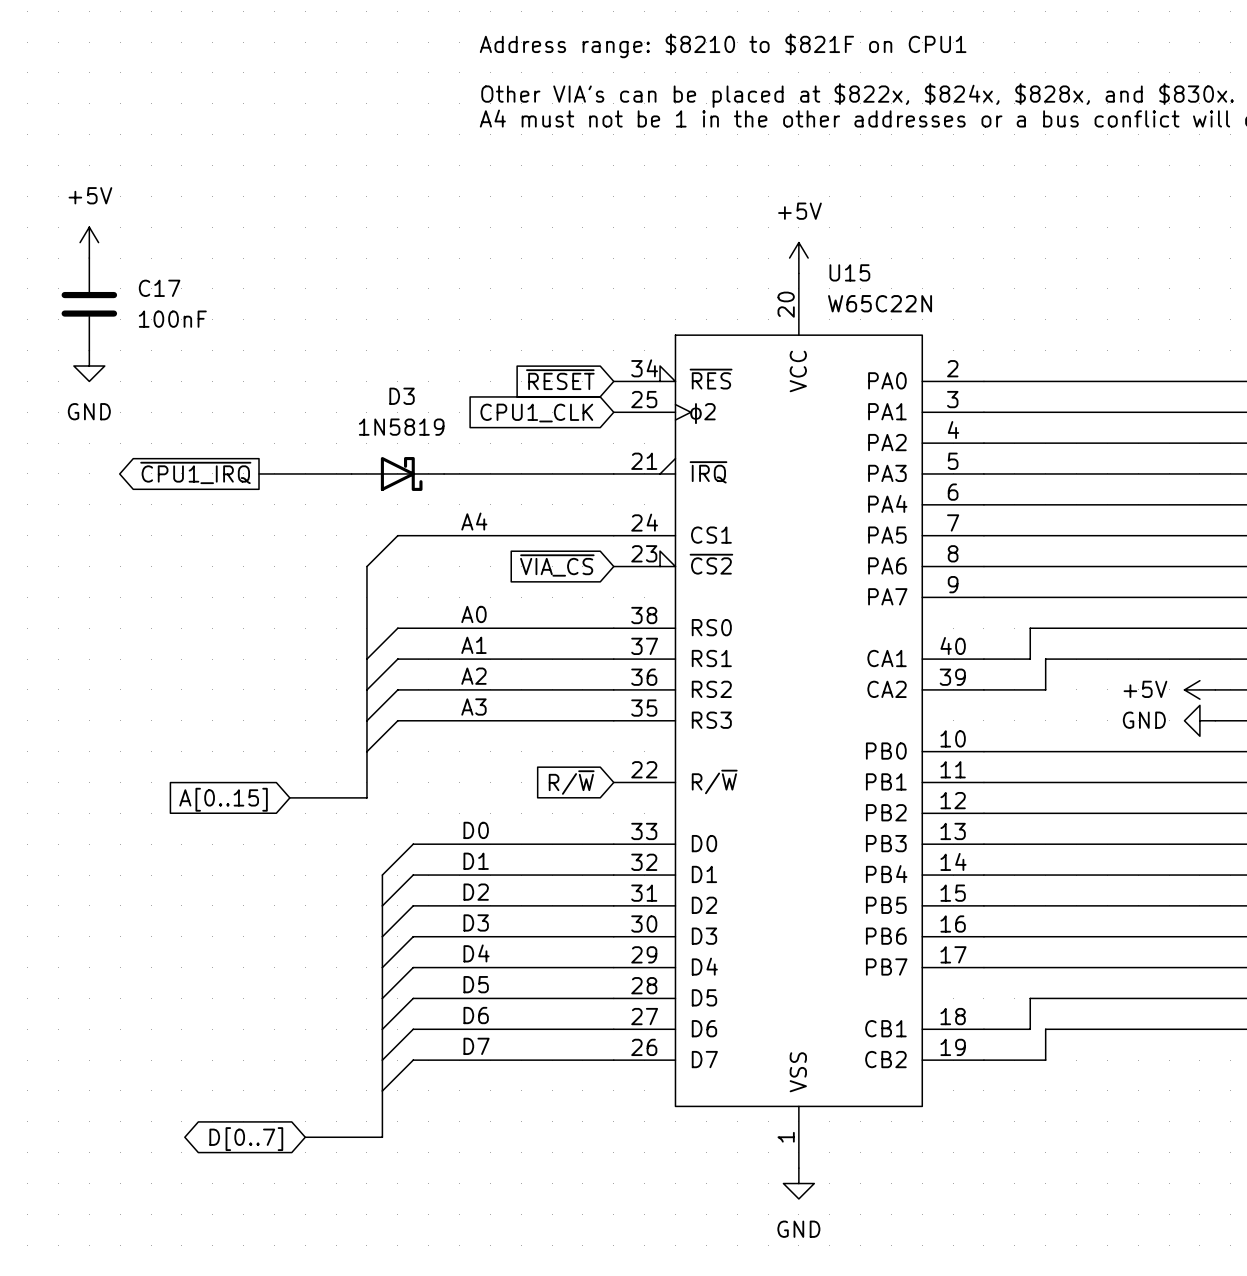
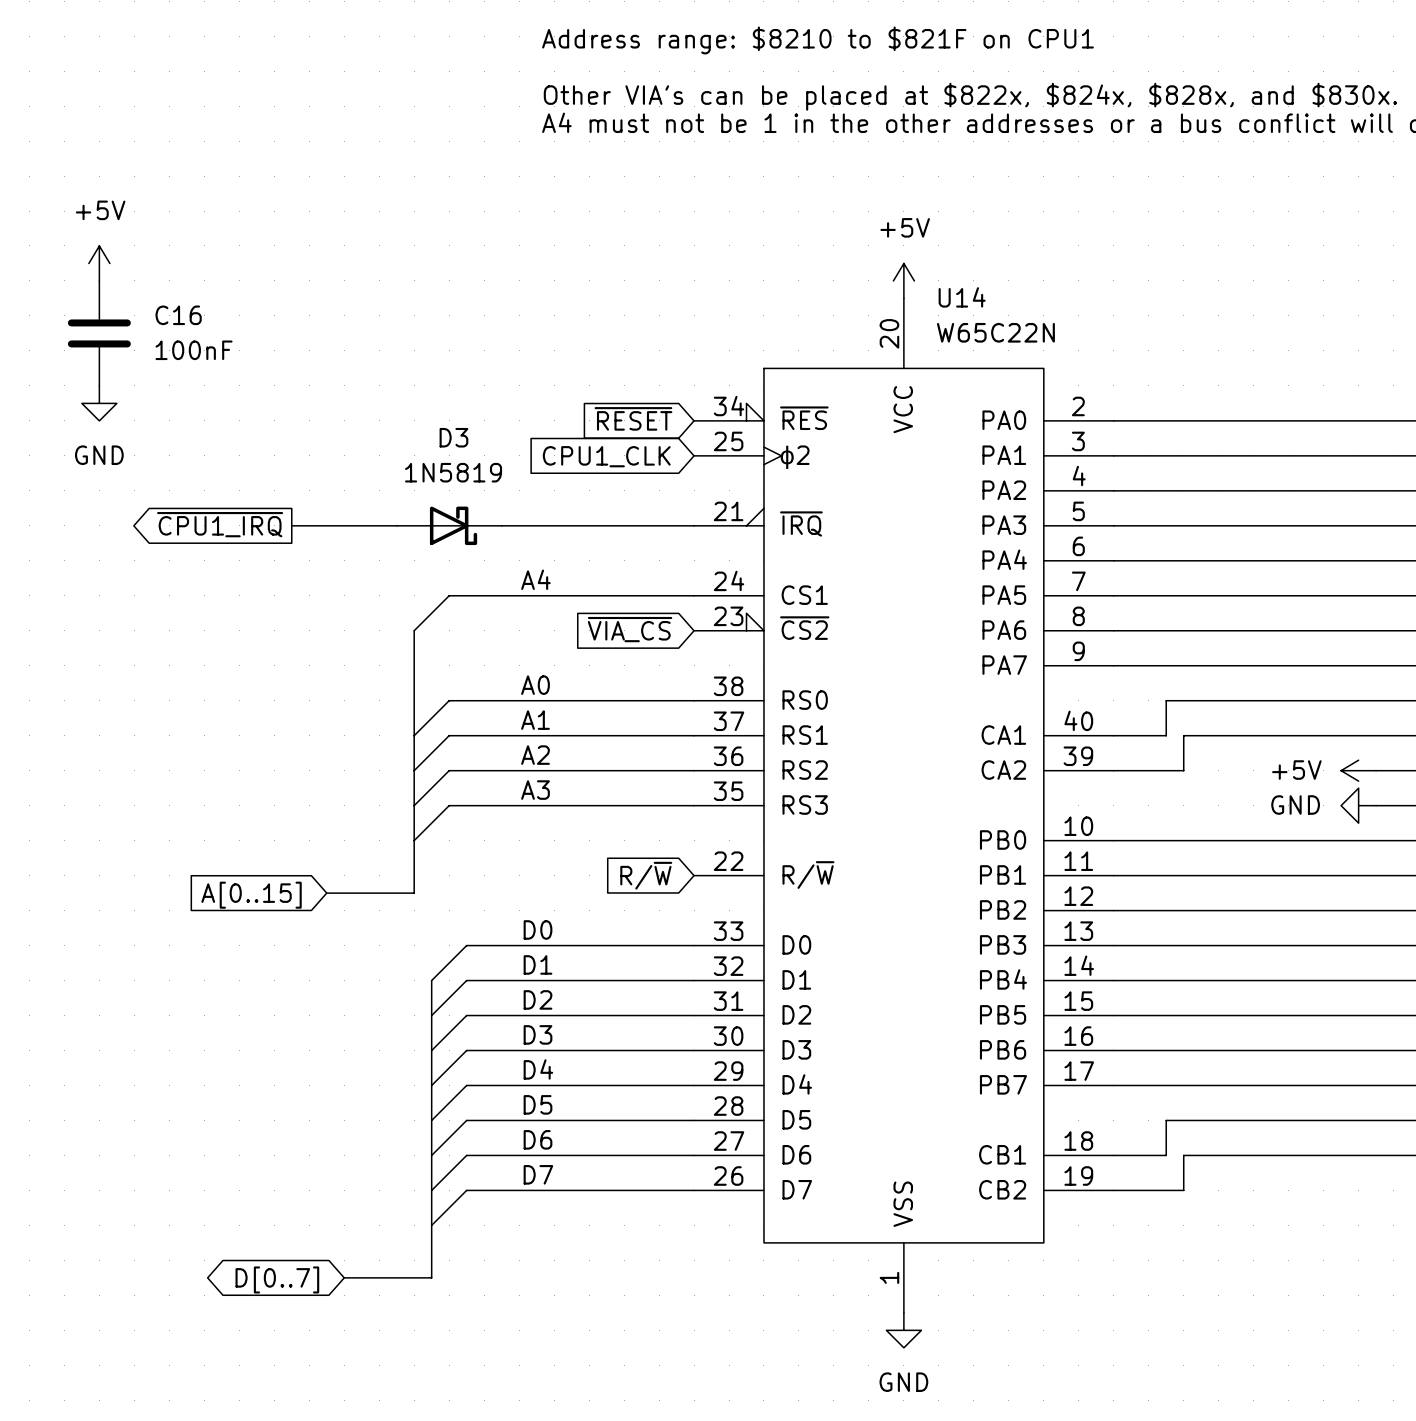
U15 name: U15 (849, 272) -> U14 (962, 297)
C17 name: C17 (159, 288) -> C16 (178, 315)

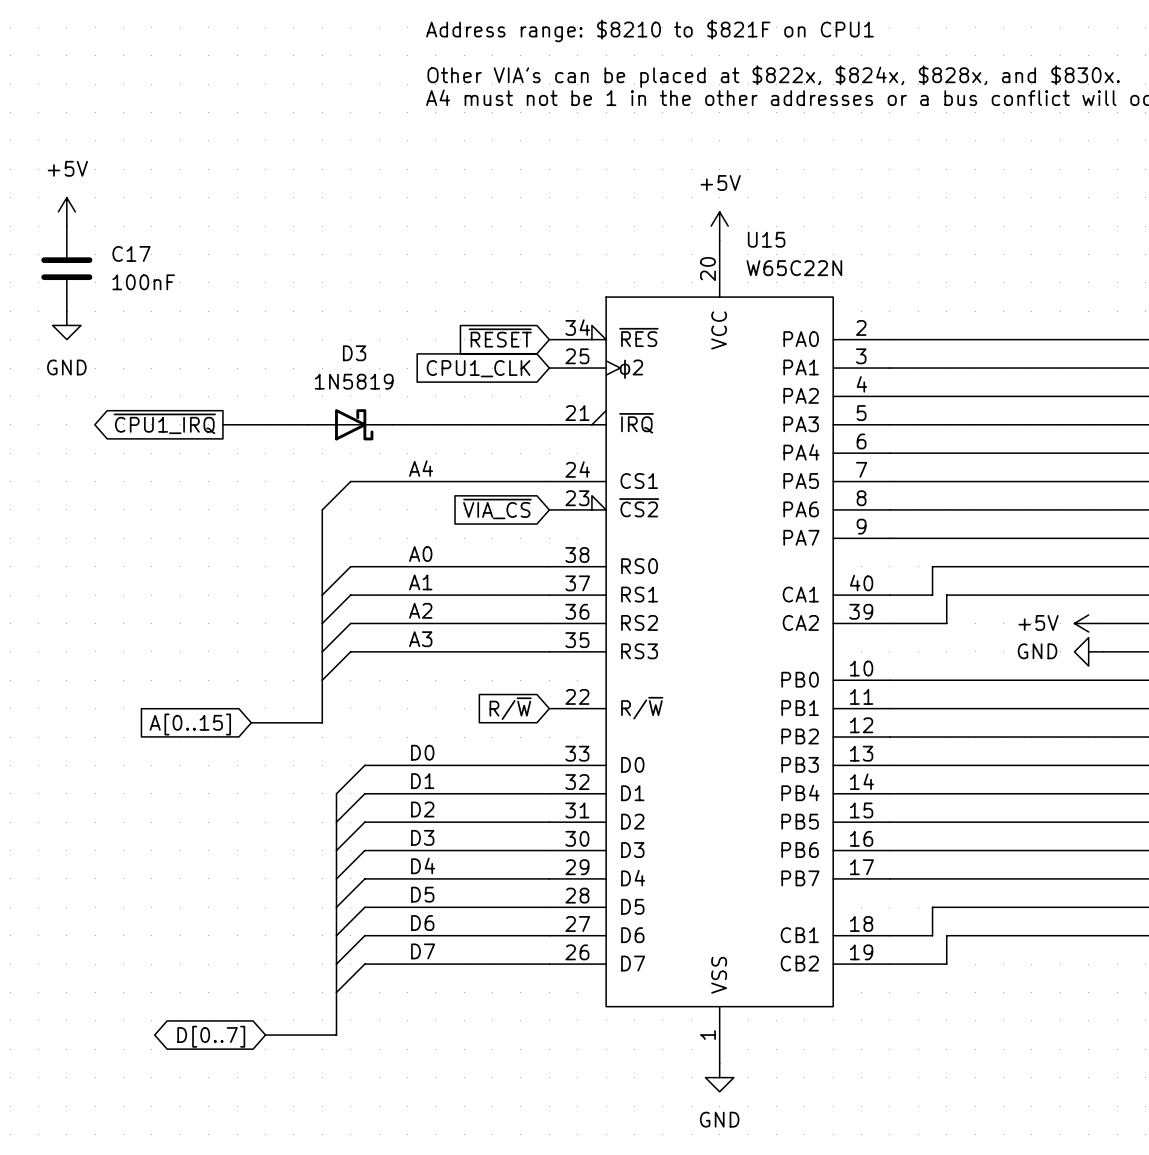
U14 name: U14 (962, 297) -> U15 (766, 239)
C16 name: C16 (178, 315) -> C17 (131, 253)

